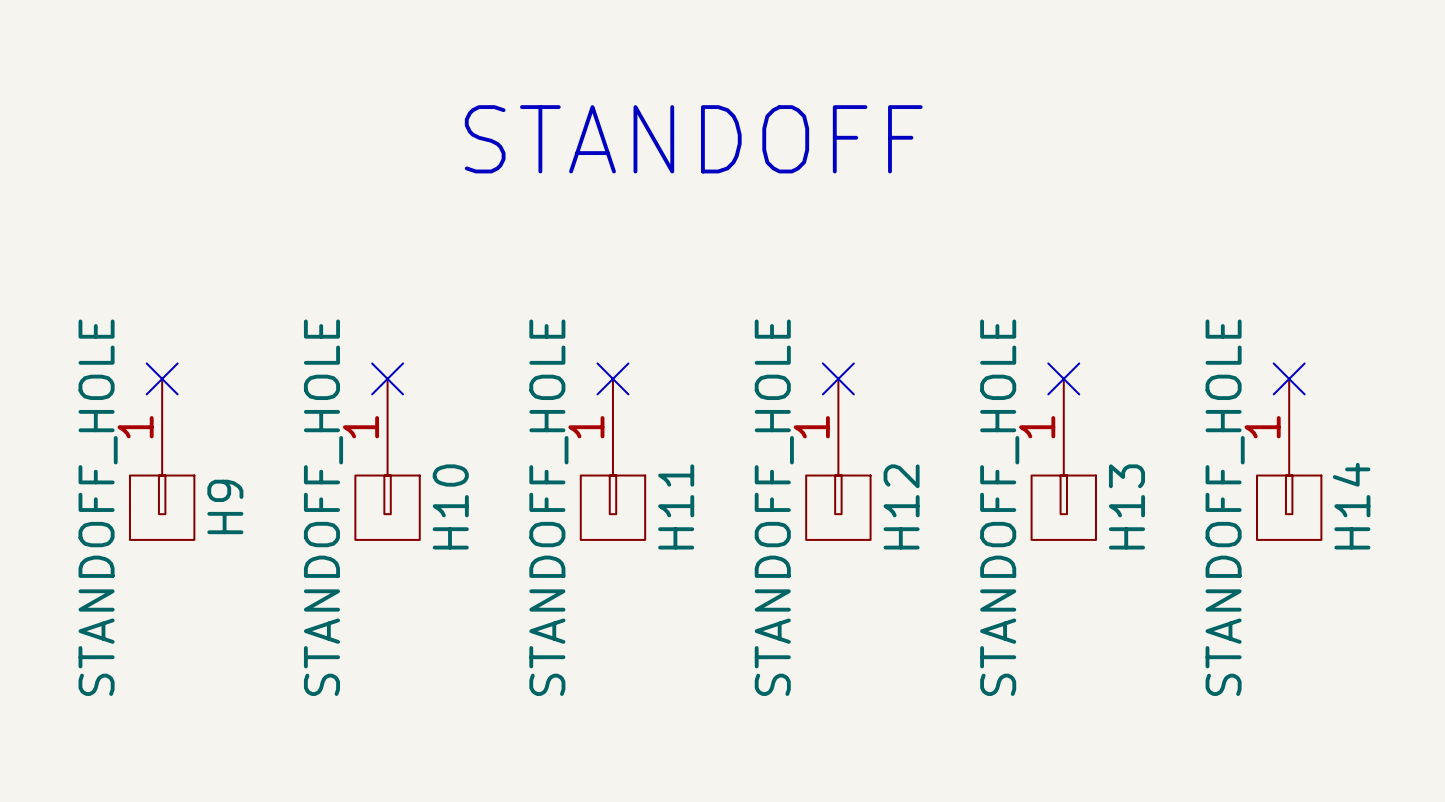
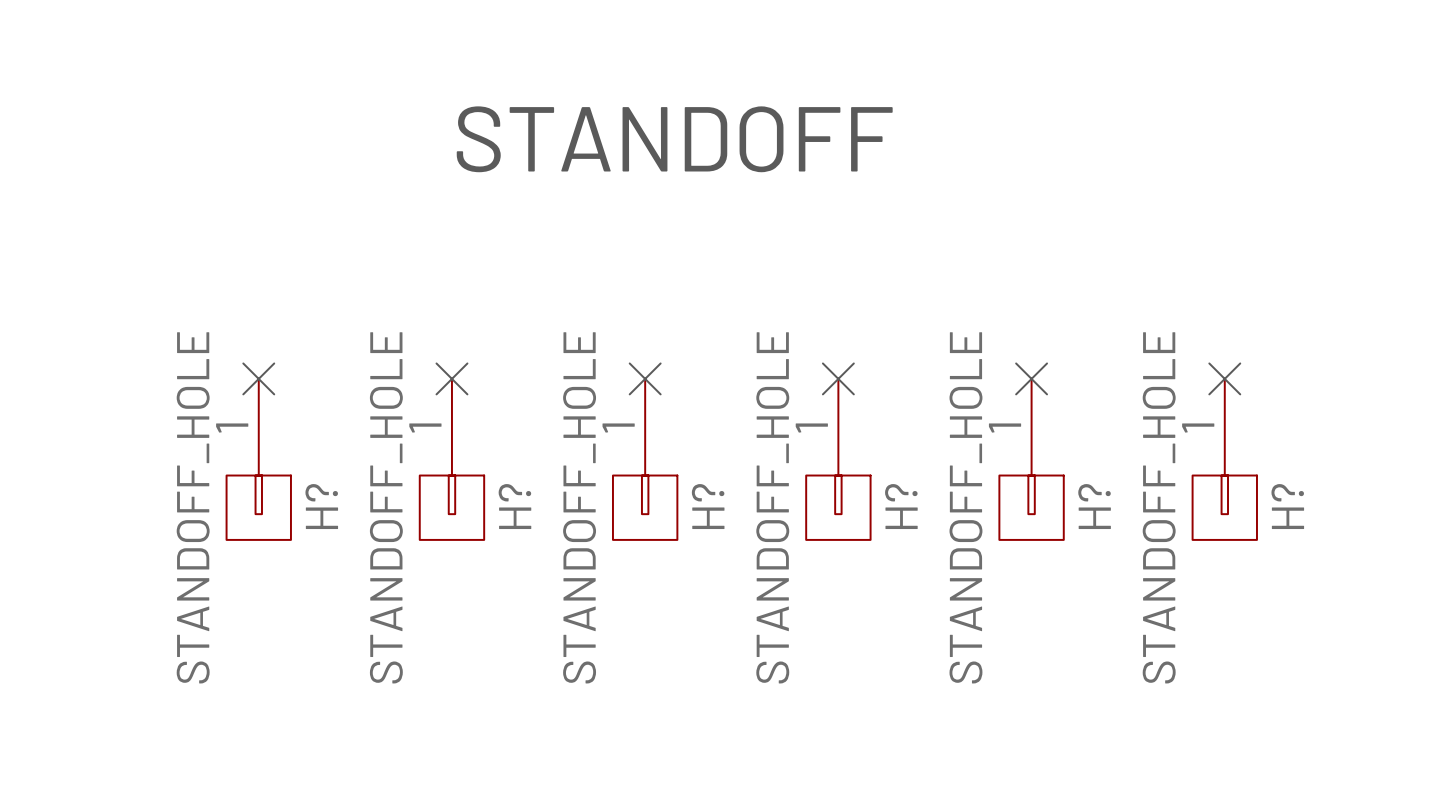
no-connect mark: (162, 378) -> none
no-connect mark: none -> (258, 378)
no-connect mark: (387, 378) -> none
no-connect mark: none -> (451, 378)
no-connect mark position: (612, 378) -> (645, 378)
no-connect mark position: (1063, 378) -> (1031, 378)
no-connect mark position: (1289, 378) -> (1224, 378)
H9: STANDOFF_HOLE (162, 459) -> none
H?: none -> STANDOFF_HOLE (258, 459)
H10: STANDOFF_HOLE (387, 459) -> none
H?: none -> STANDOFF_HOLE (451, 459)
H11: STANDOFF_HOLE (612, 459) -> none
H?: none -> STANDOFF_HOLE (645, 459)
H?: none -> STANDOFF_HOLE (1031, 459)
H13: STANDOFF_HOLE (1063, 459) -> none
H?: none -> STANDOFF_HOLE (1224, 459)
H14: STANDOFF_HOLE (1289, 459) -> none
H12 name: H12 (901, 506) -> H? (901, 506)

